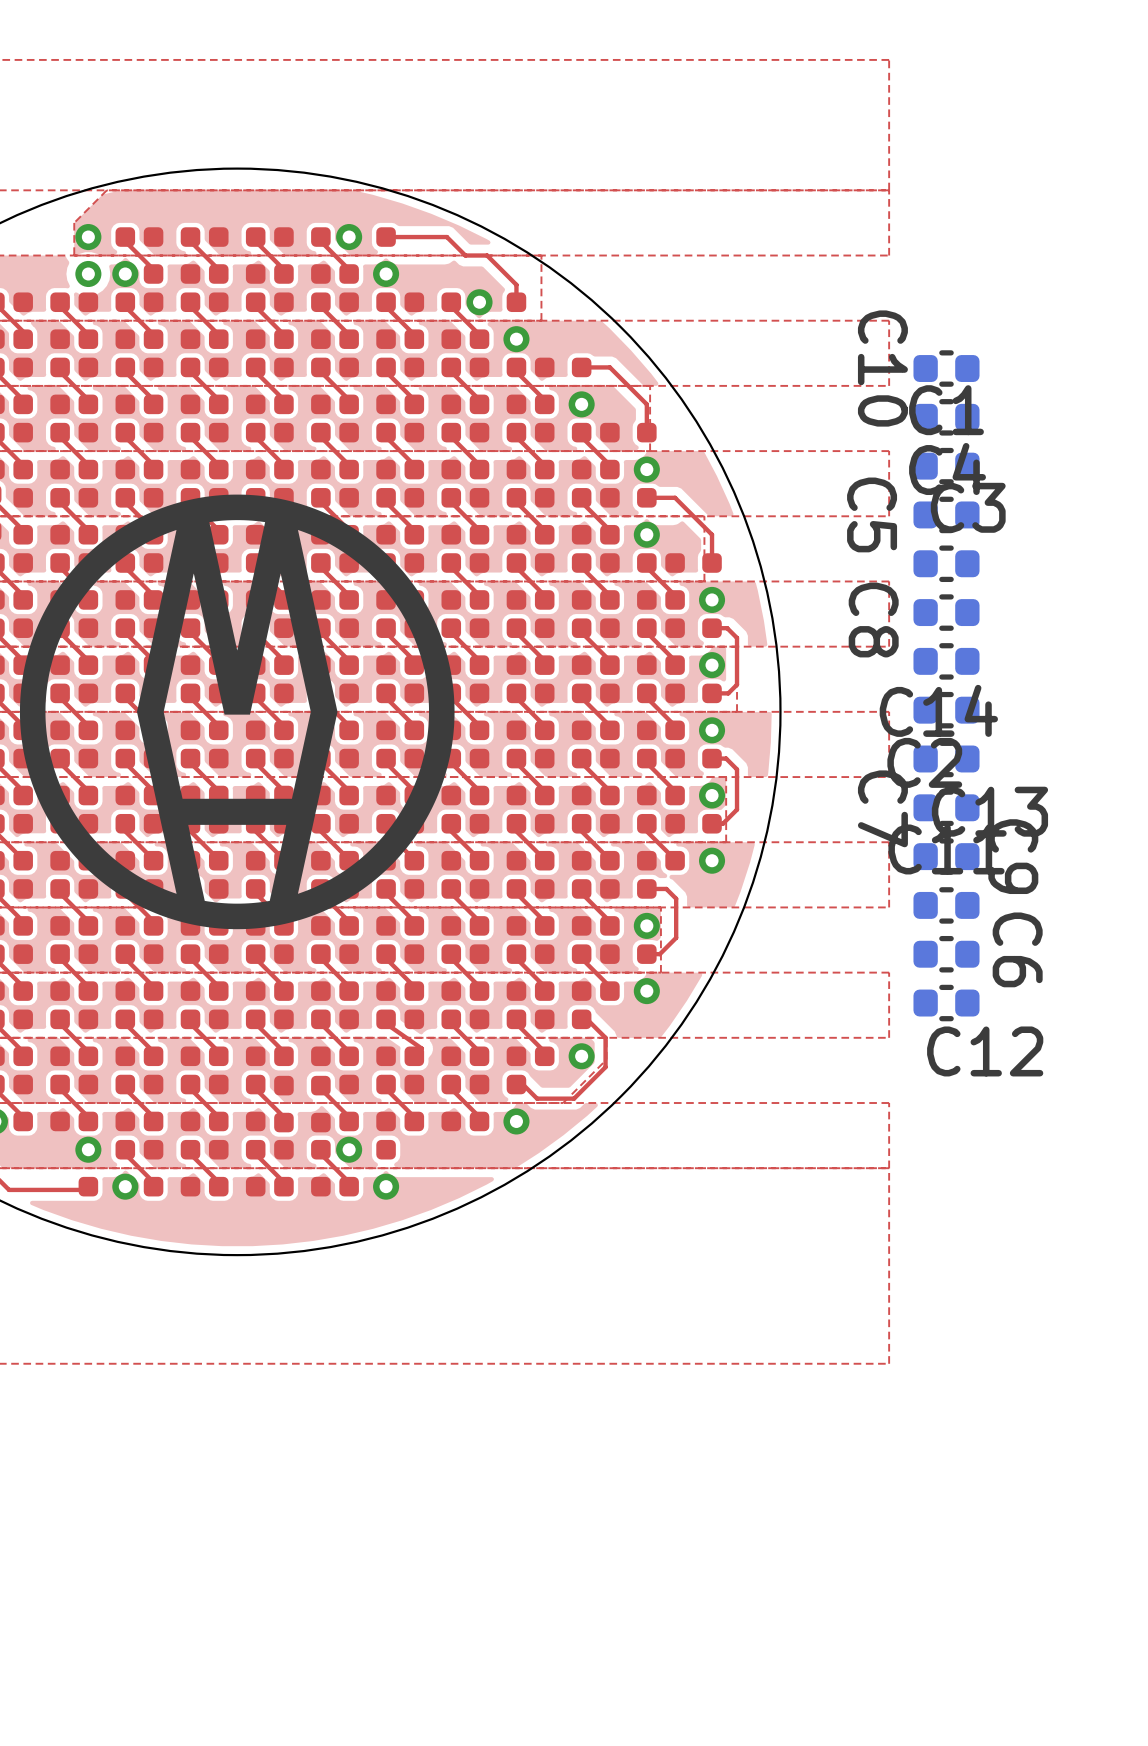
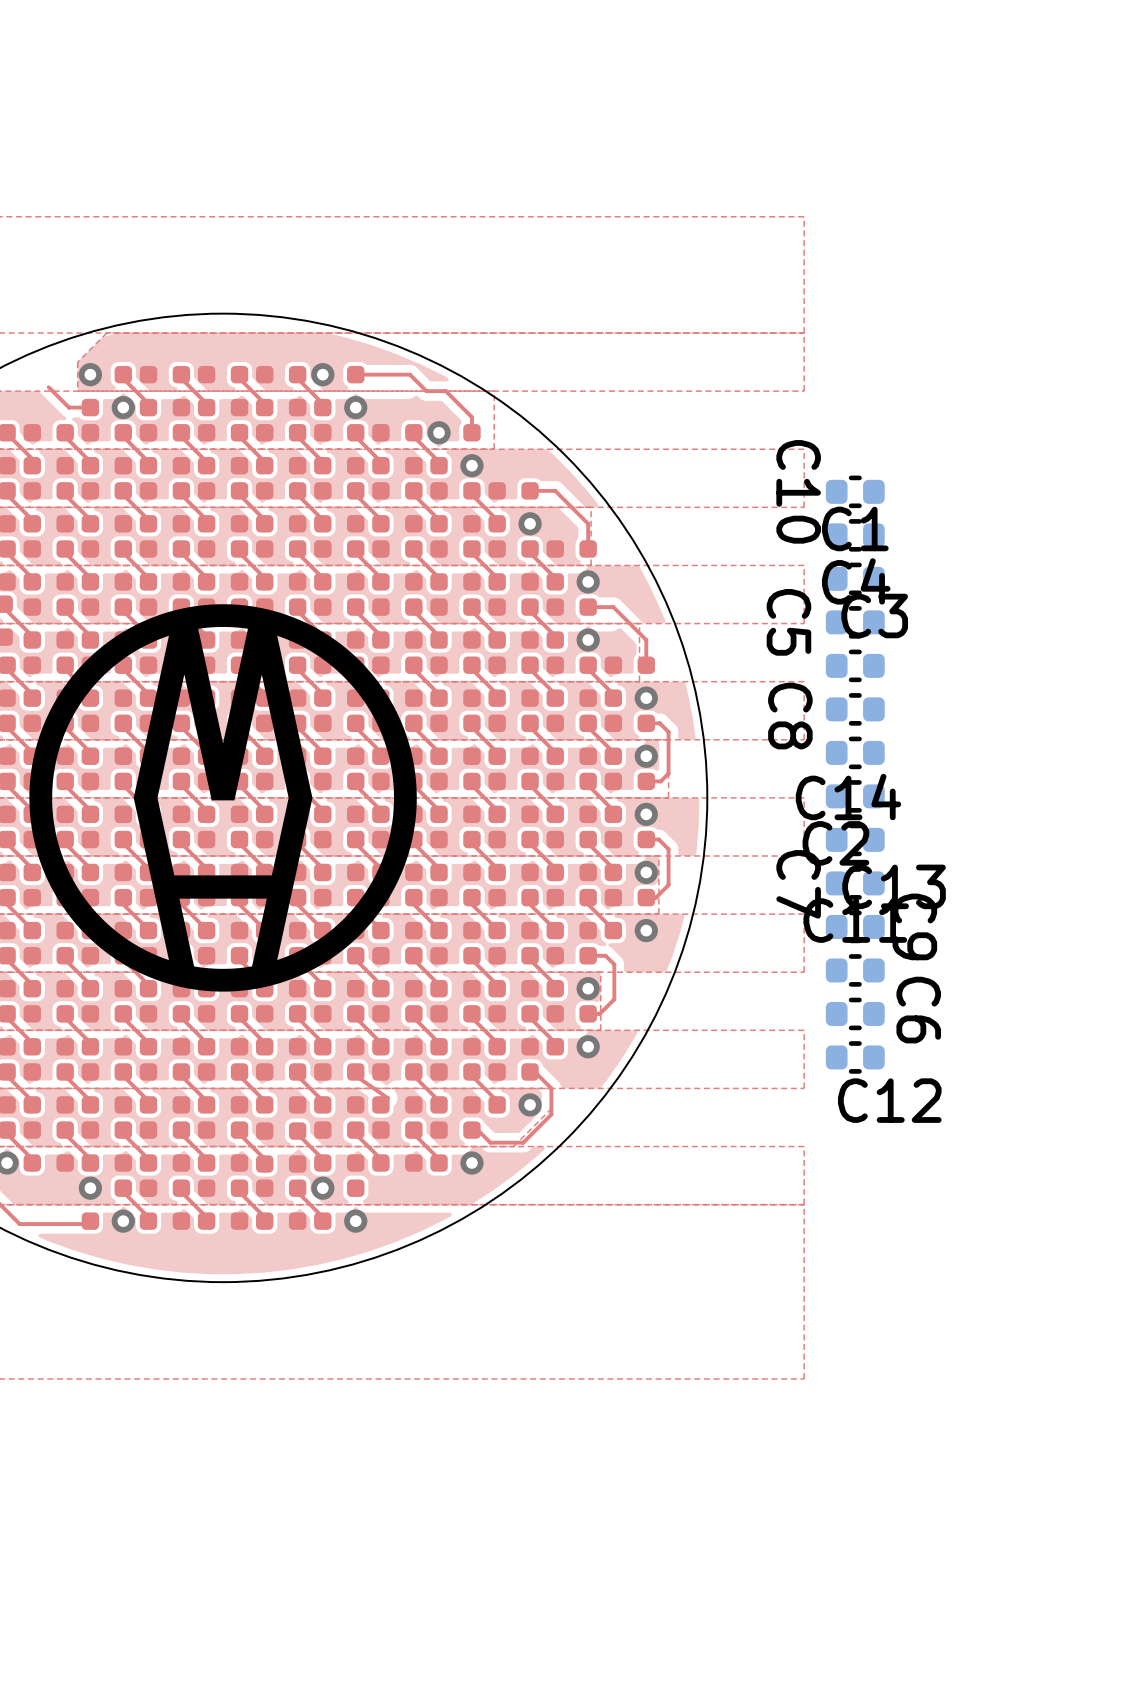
top track: none -> (48, 387) (69, 407) (90, 407)
via: (88, 273) -> none

